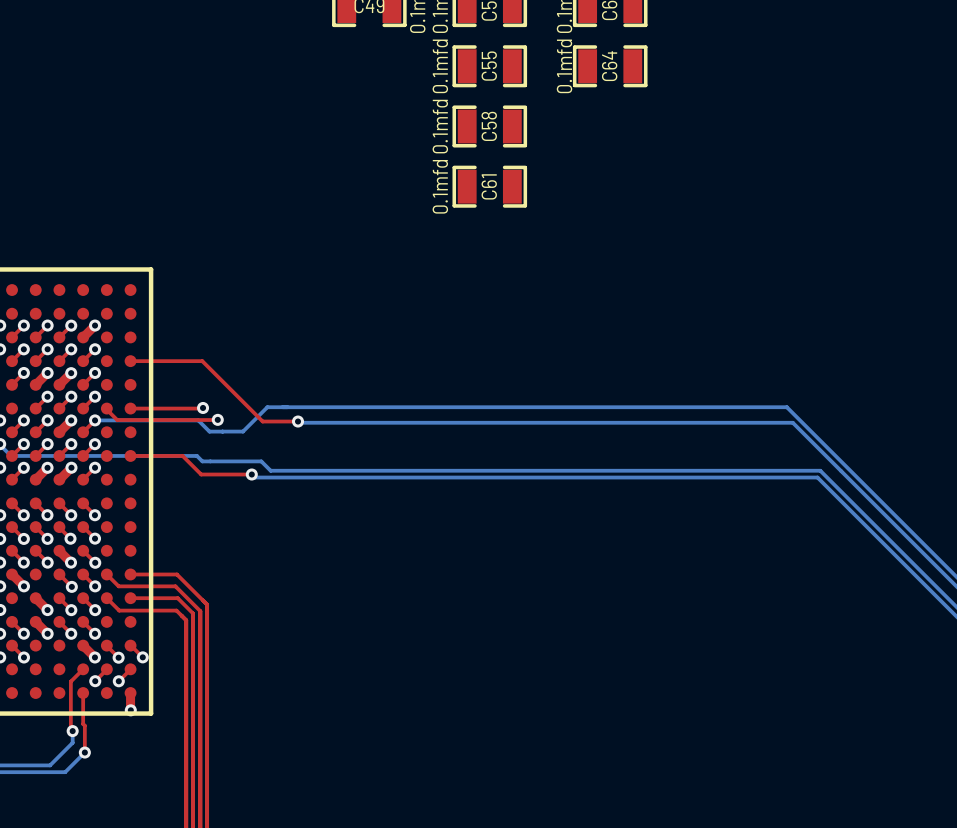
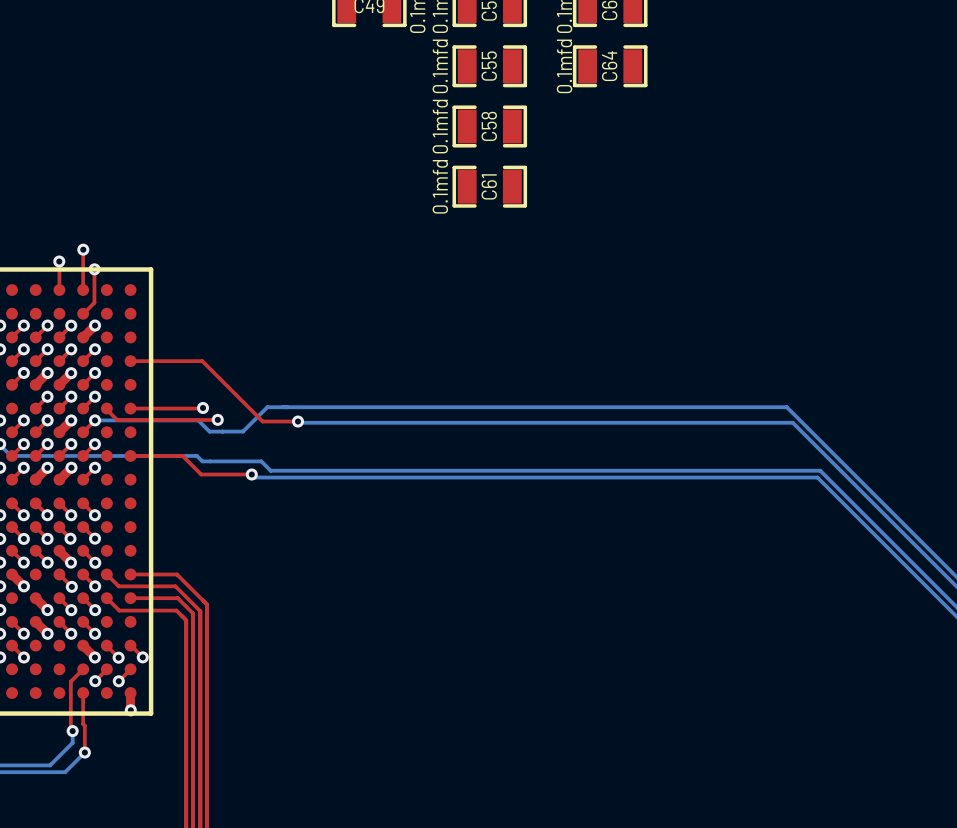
top track: none -> (83, 249) (83, 290)
via: none -> (83, 249)
top track: none -> (59, 261) (59, 290)
via: none -> (59, 261)
top track: none -> (94, 269) (94, 302) (83, 313)
via: none -> (94, 269)

